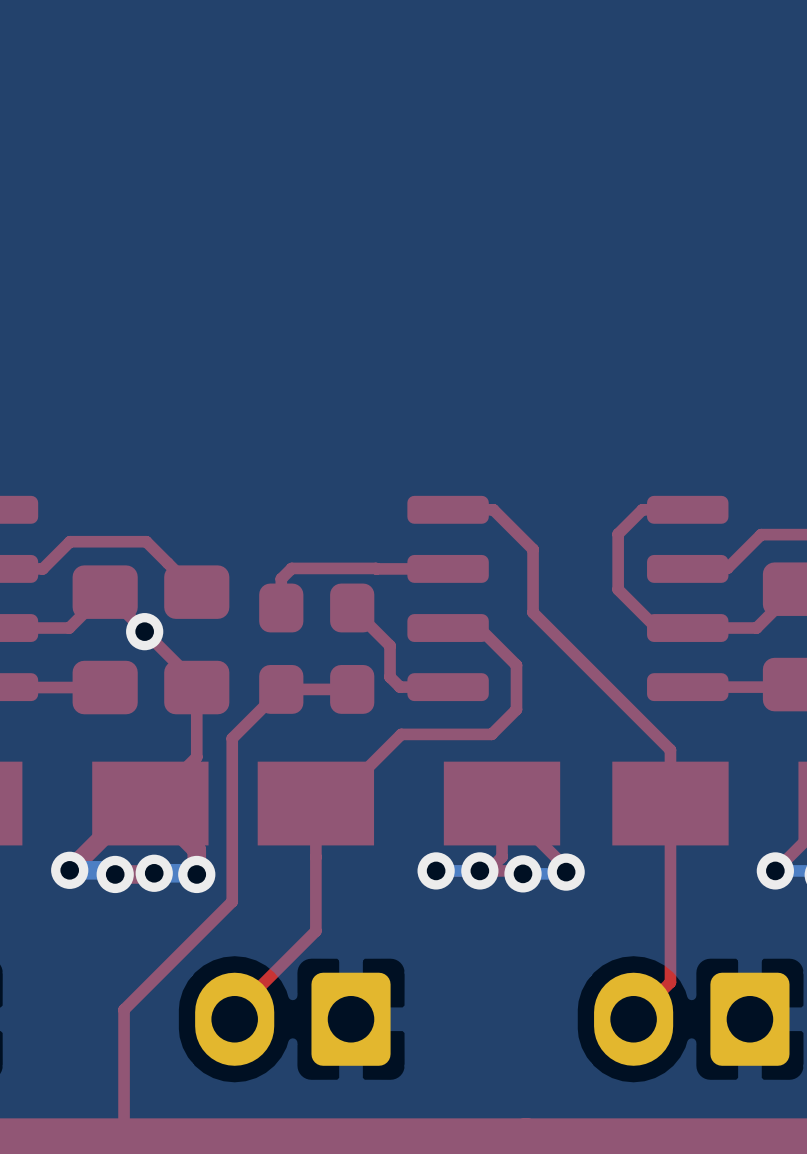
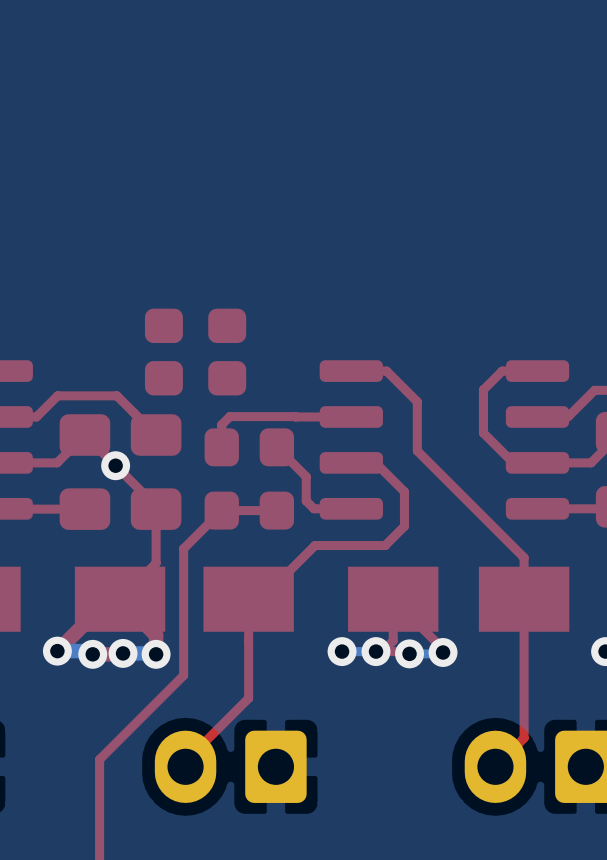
part: none -> (195, 325)
part: none -> (195, 378)

